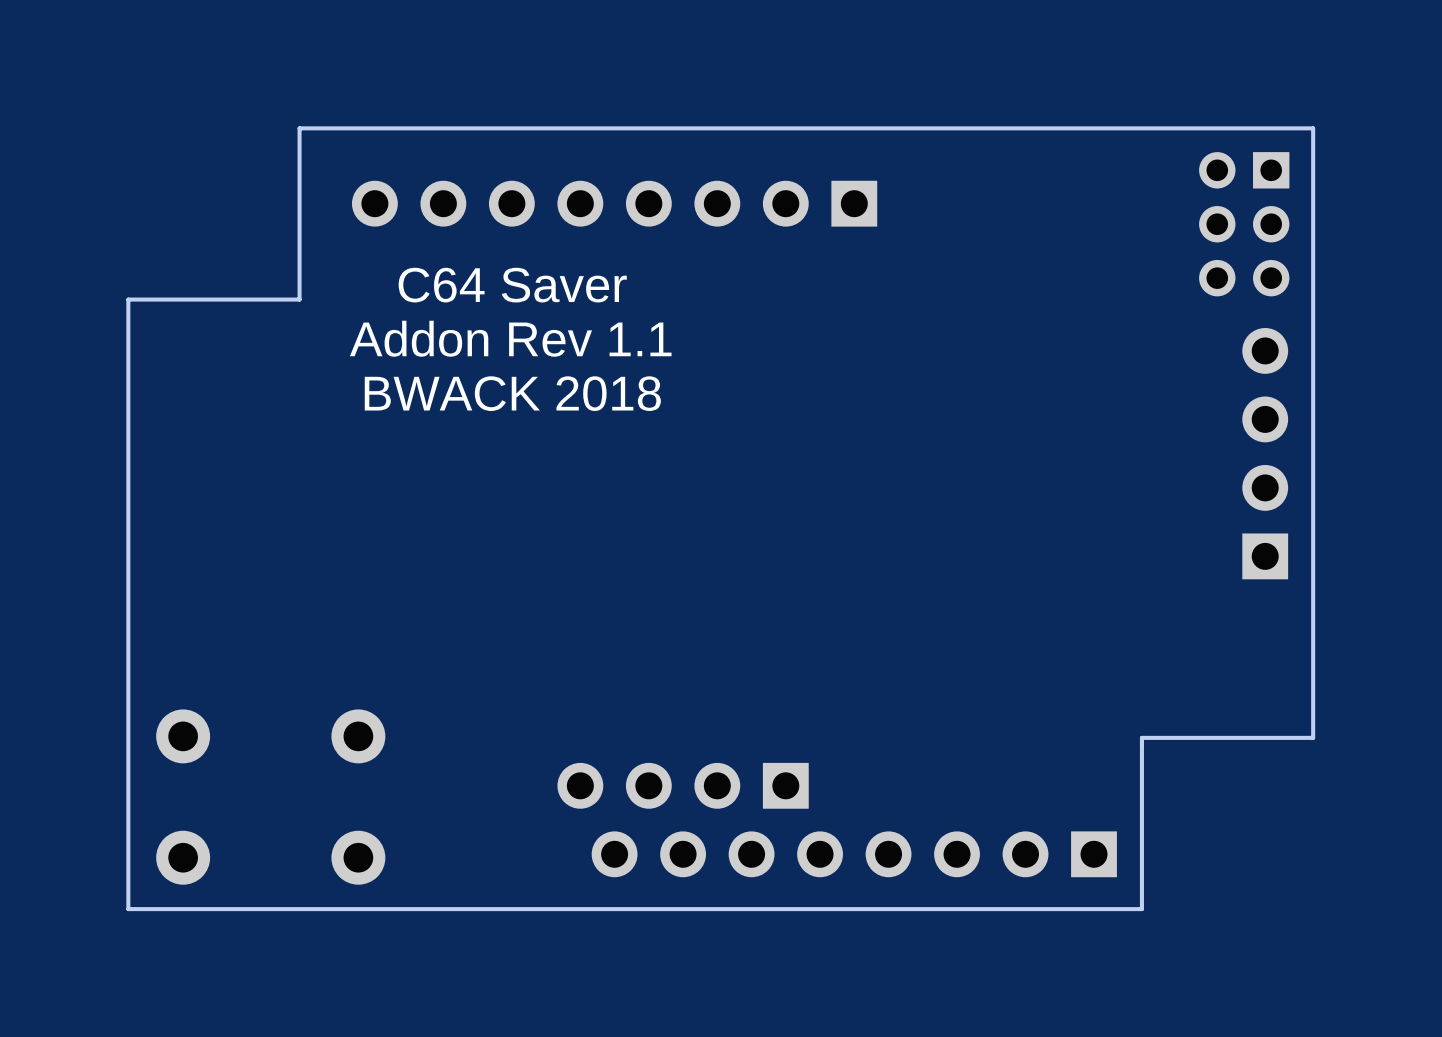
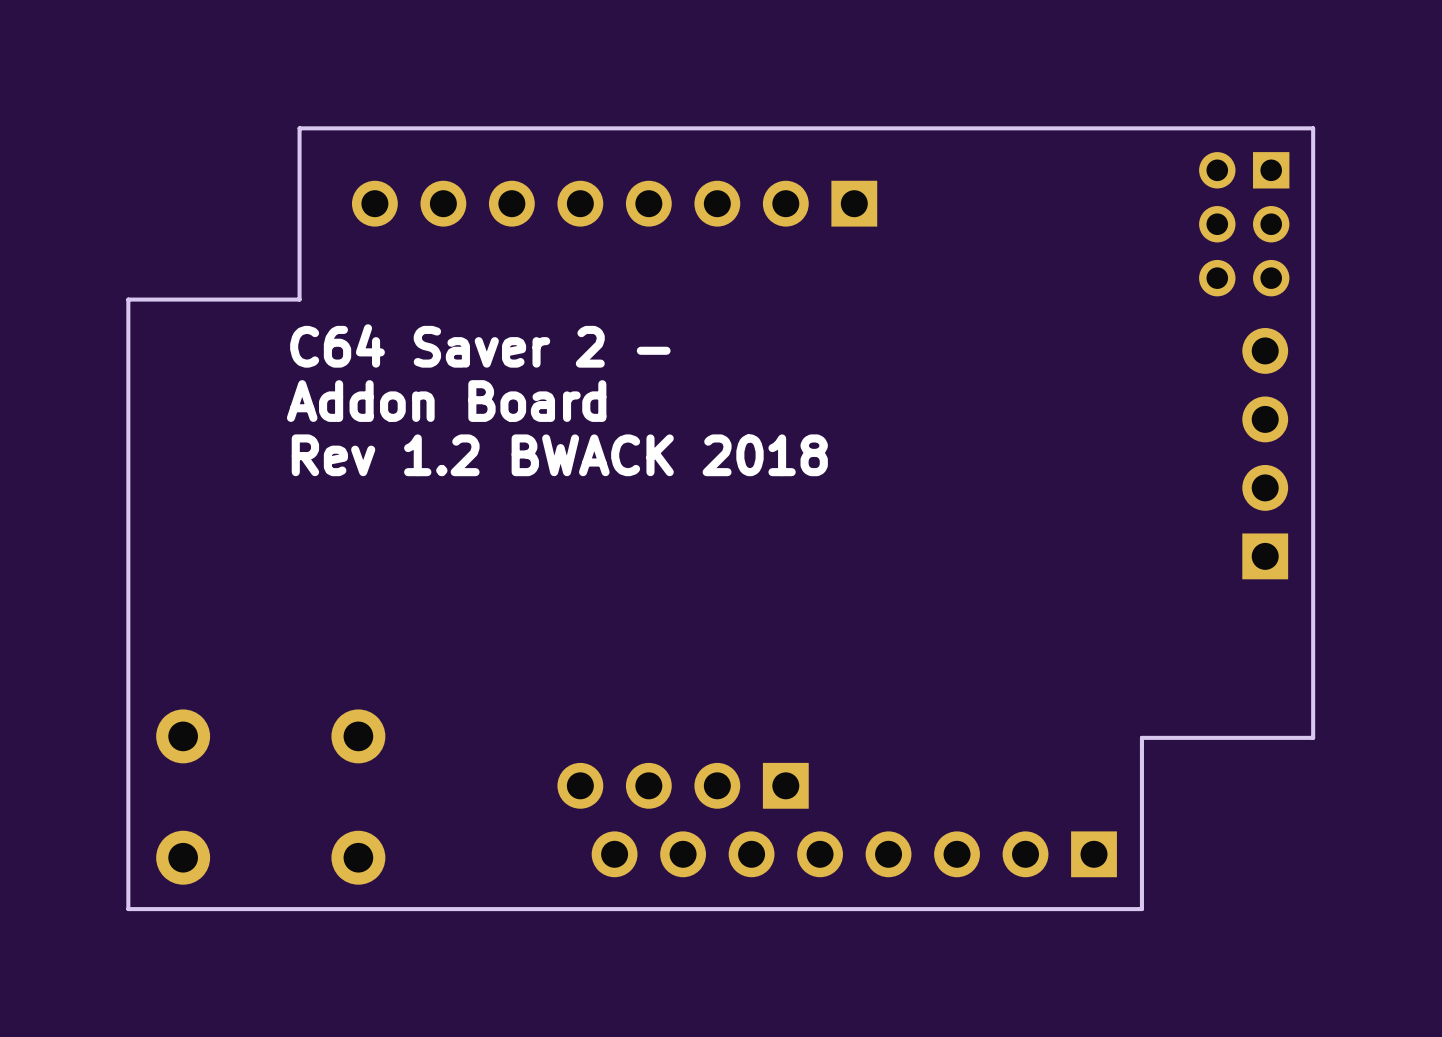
text: C64 Saver (512, 285) -> C64 Saver 2 - (480, 345)
text: Addon Rev 1.1 (510, 338) -> none
text: BWACK 2018 (512, 393) -> Rev 1.2 BWACK 2018 (559, 455)
text: none -> Addon Board (446, 401)

